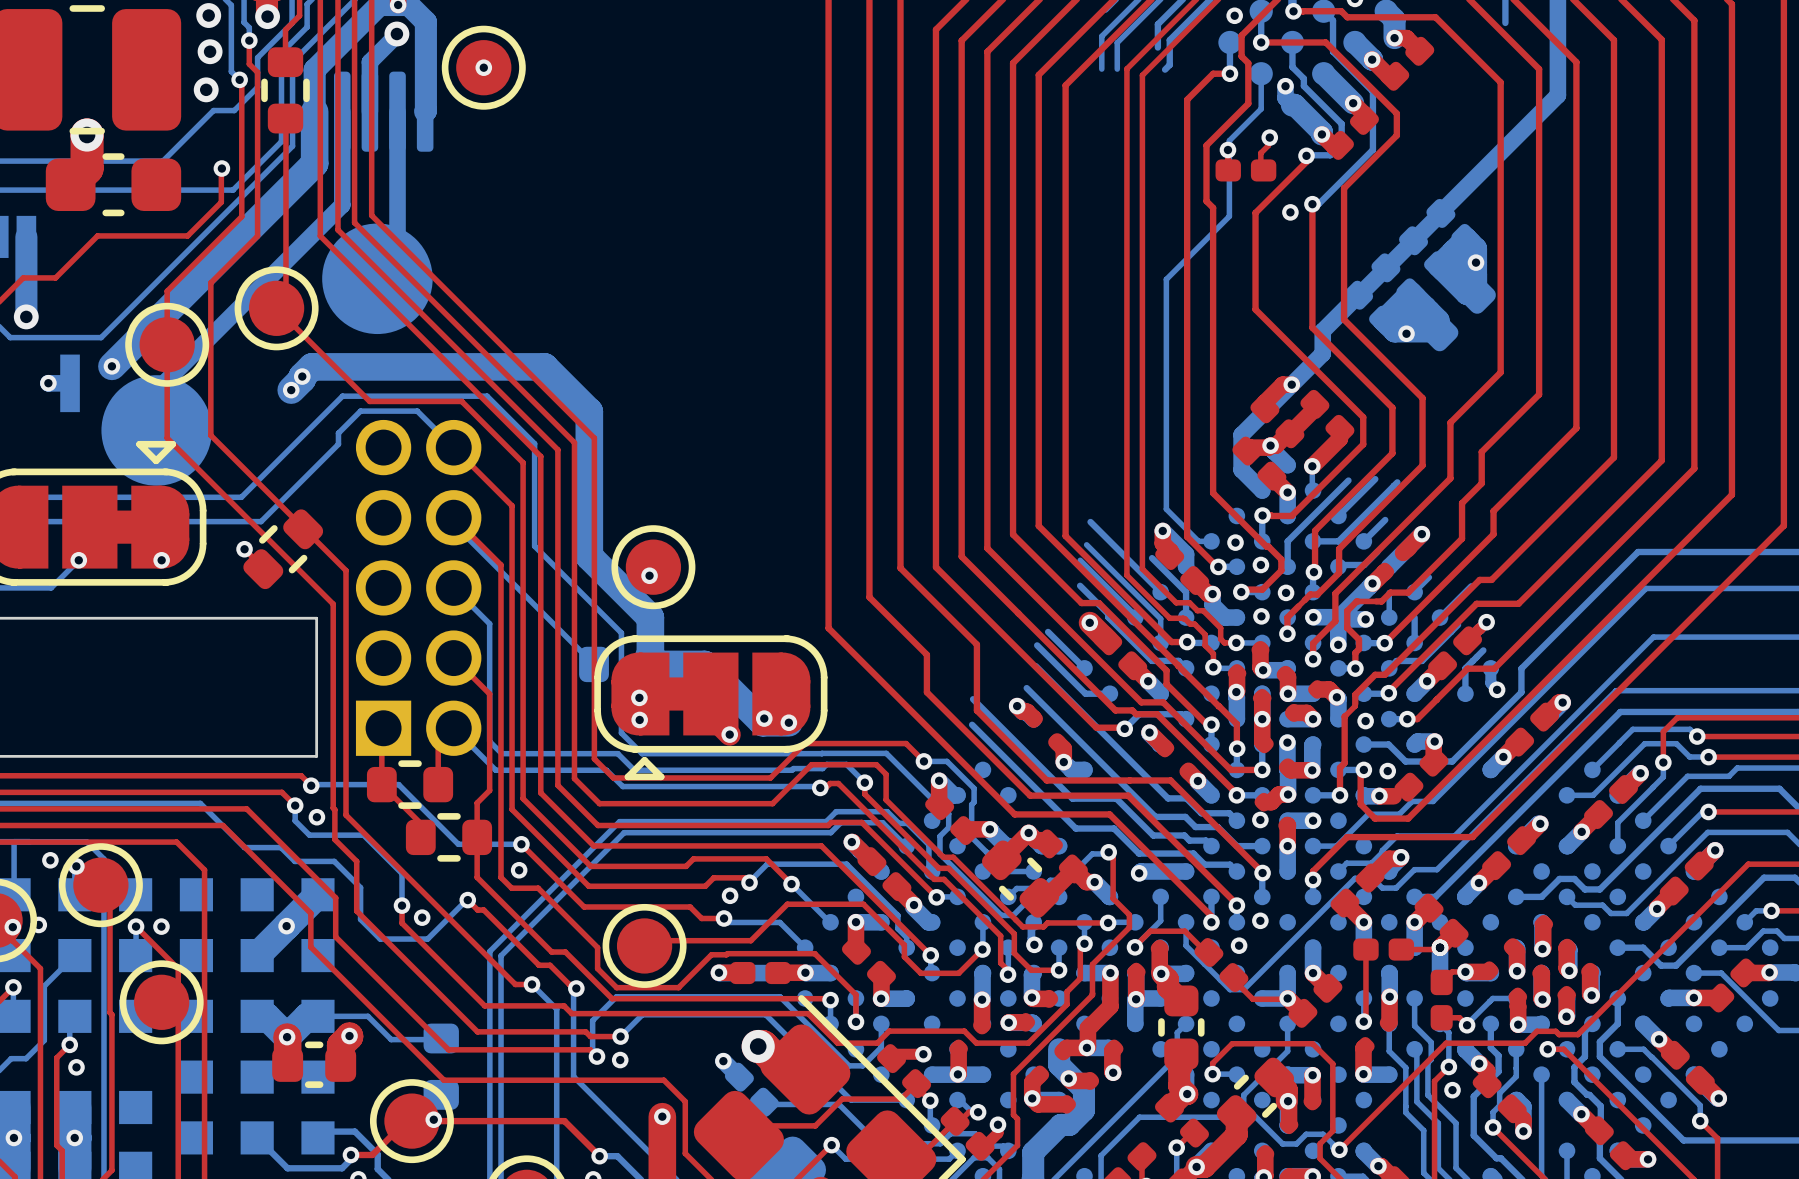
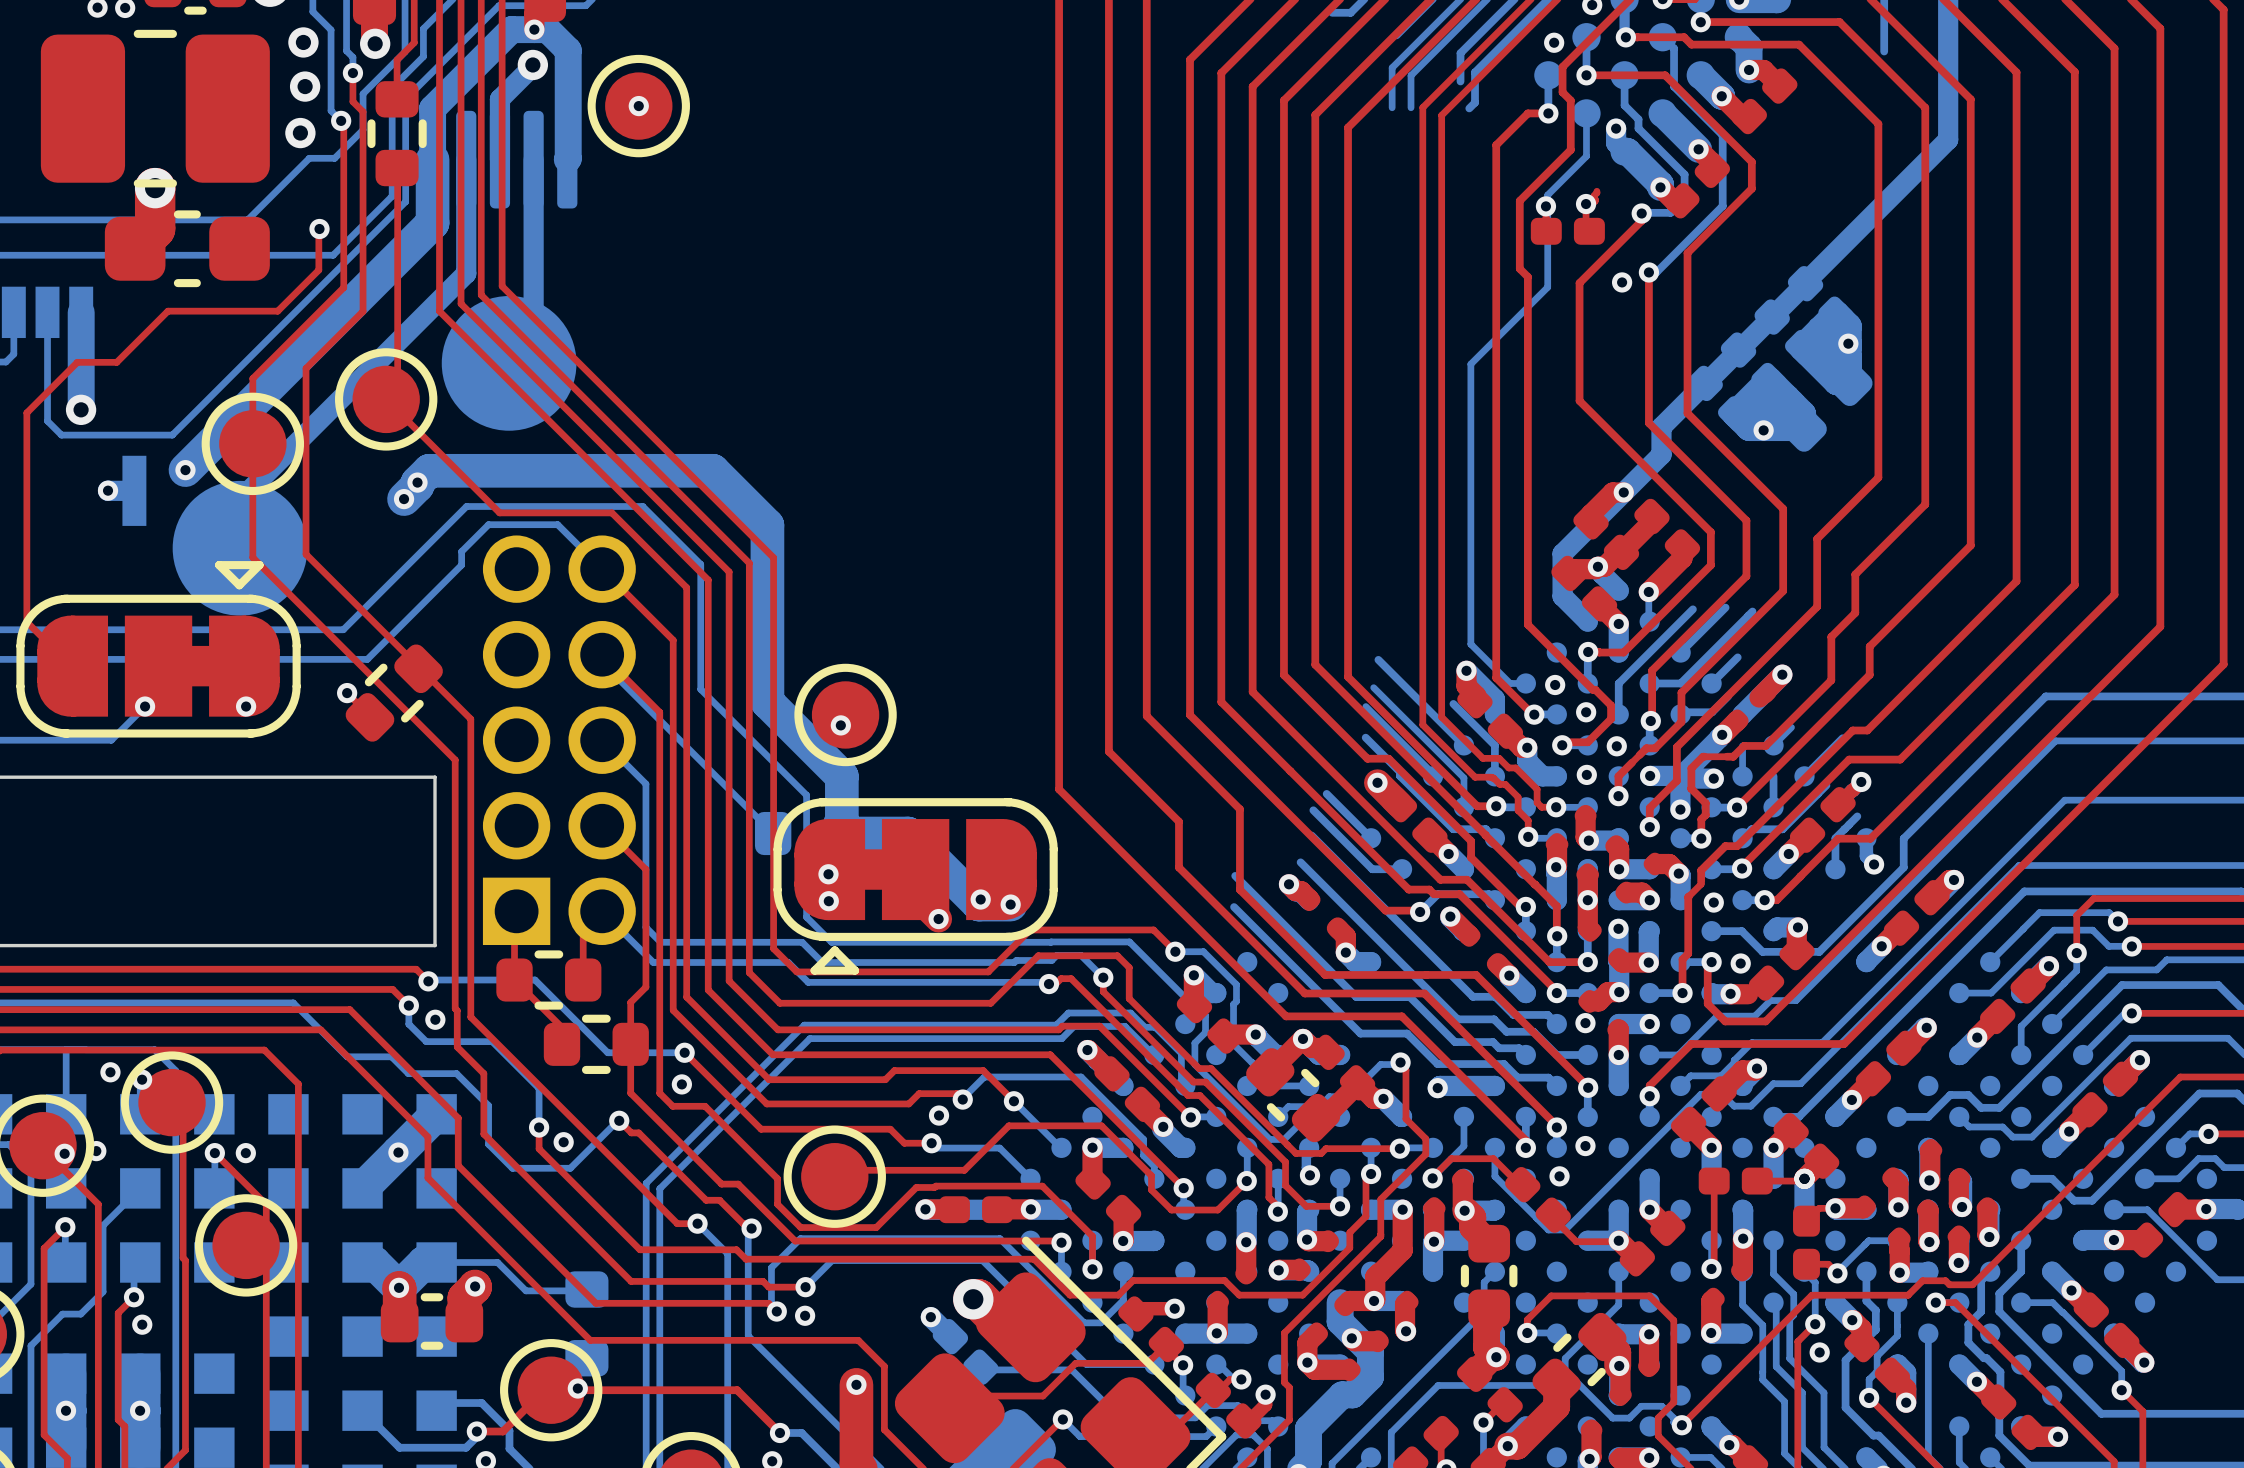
via position: (1269, 137) -> (1586, 204)

